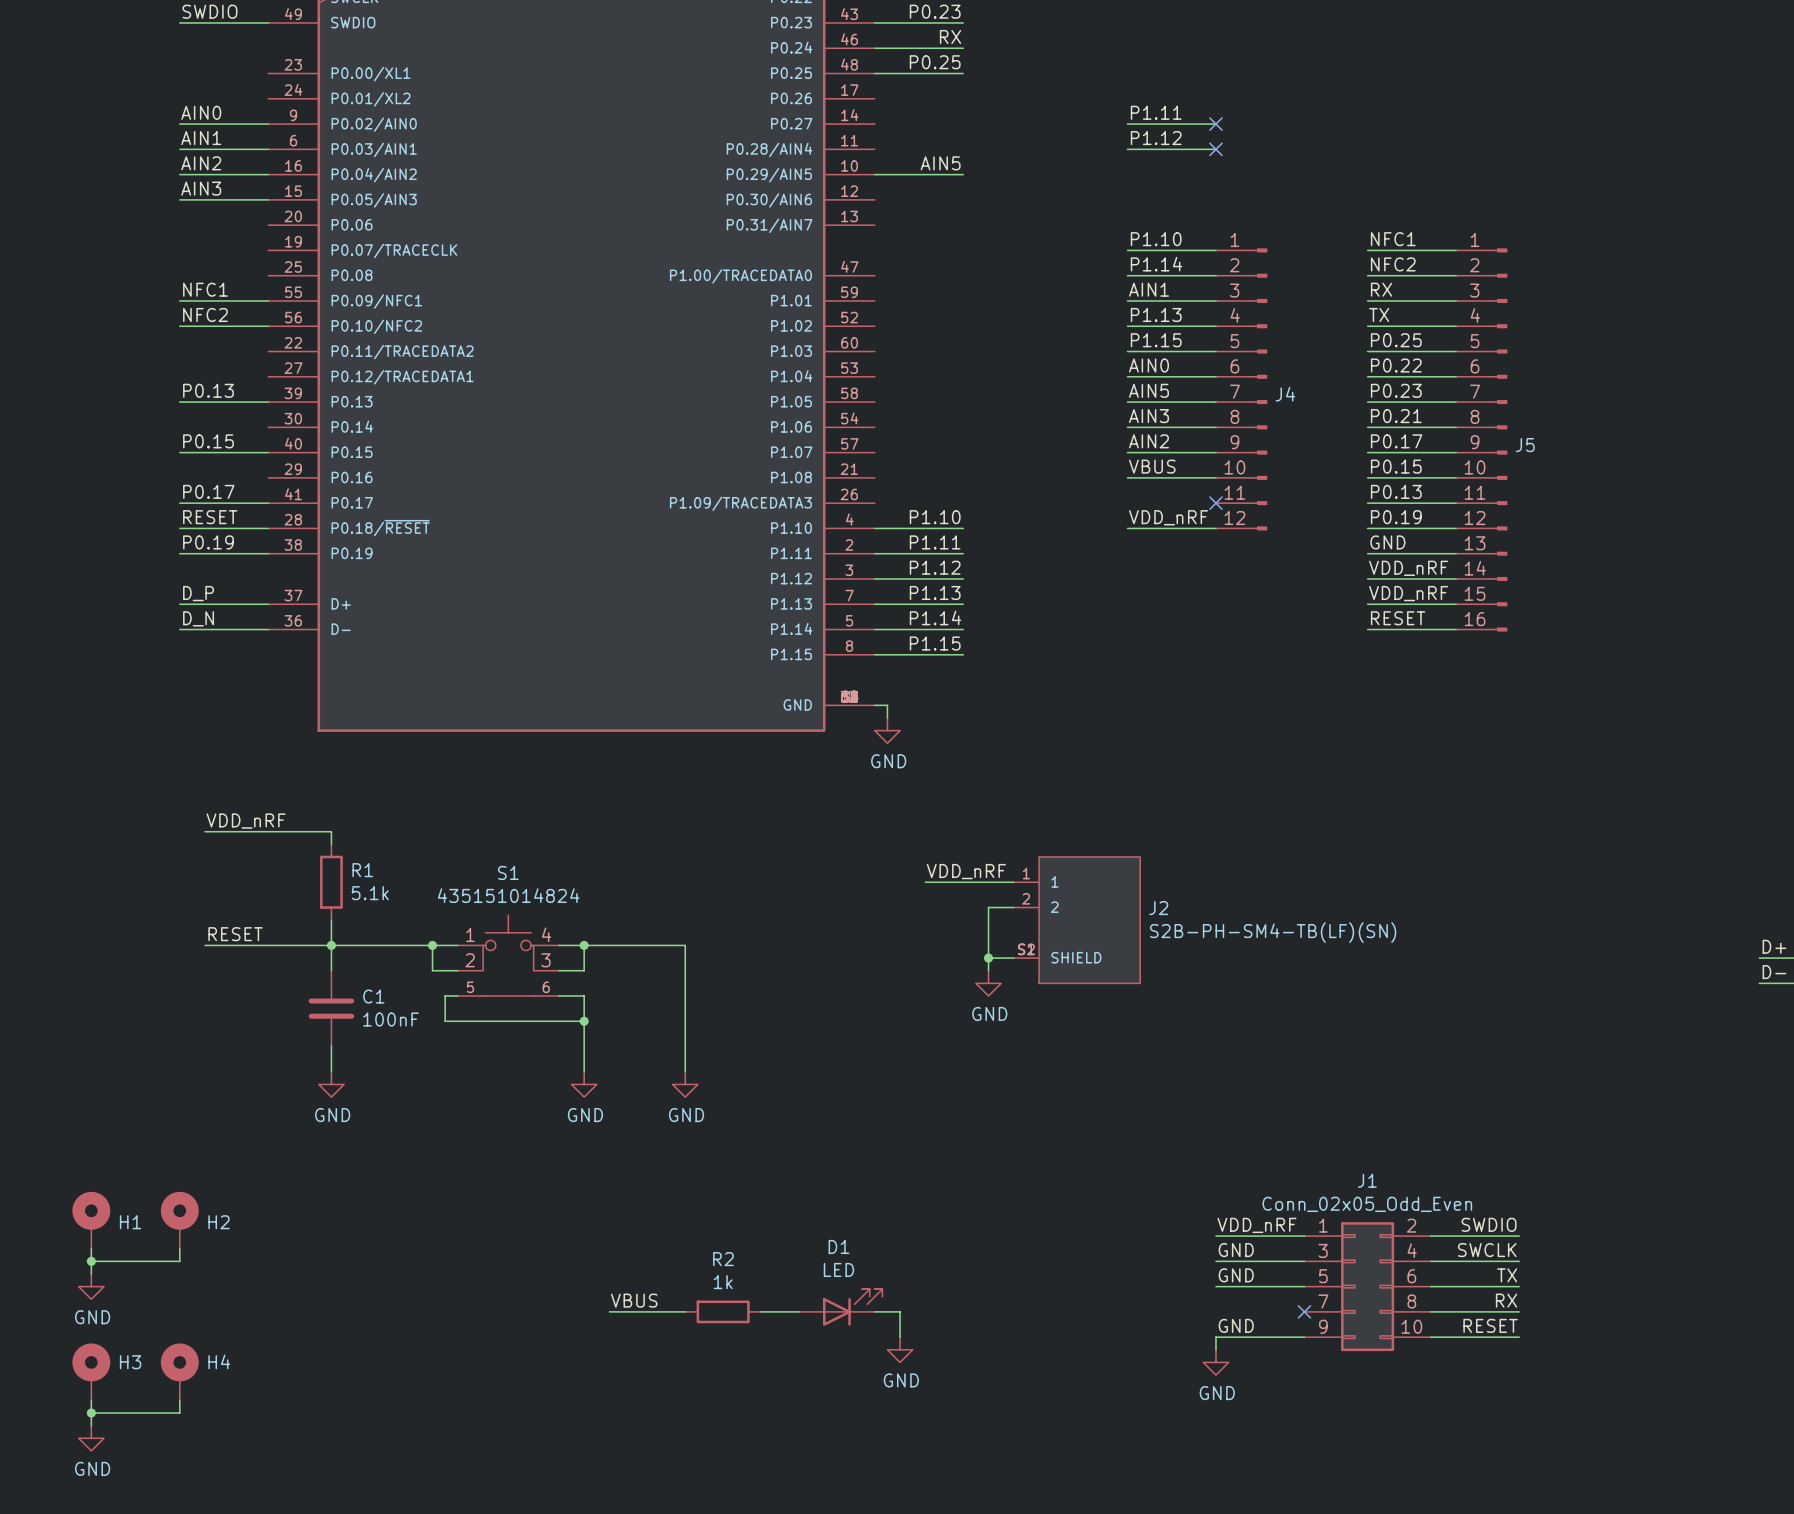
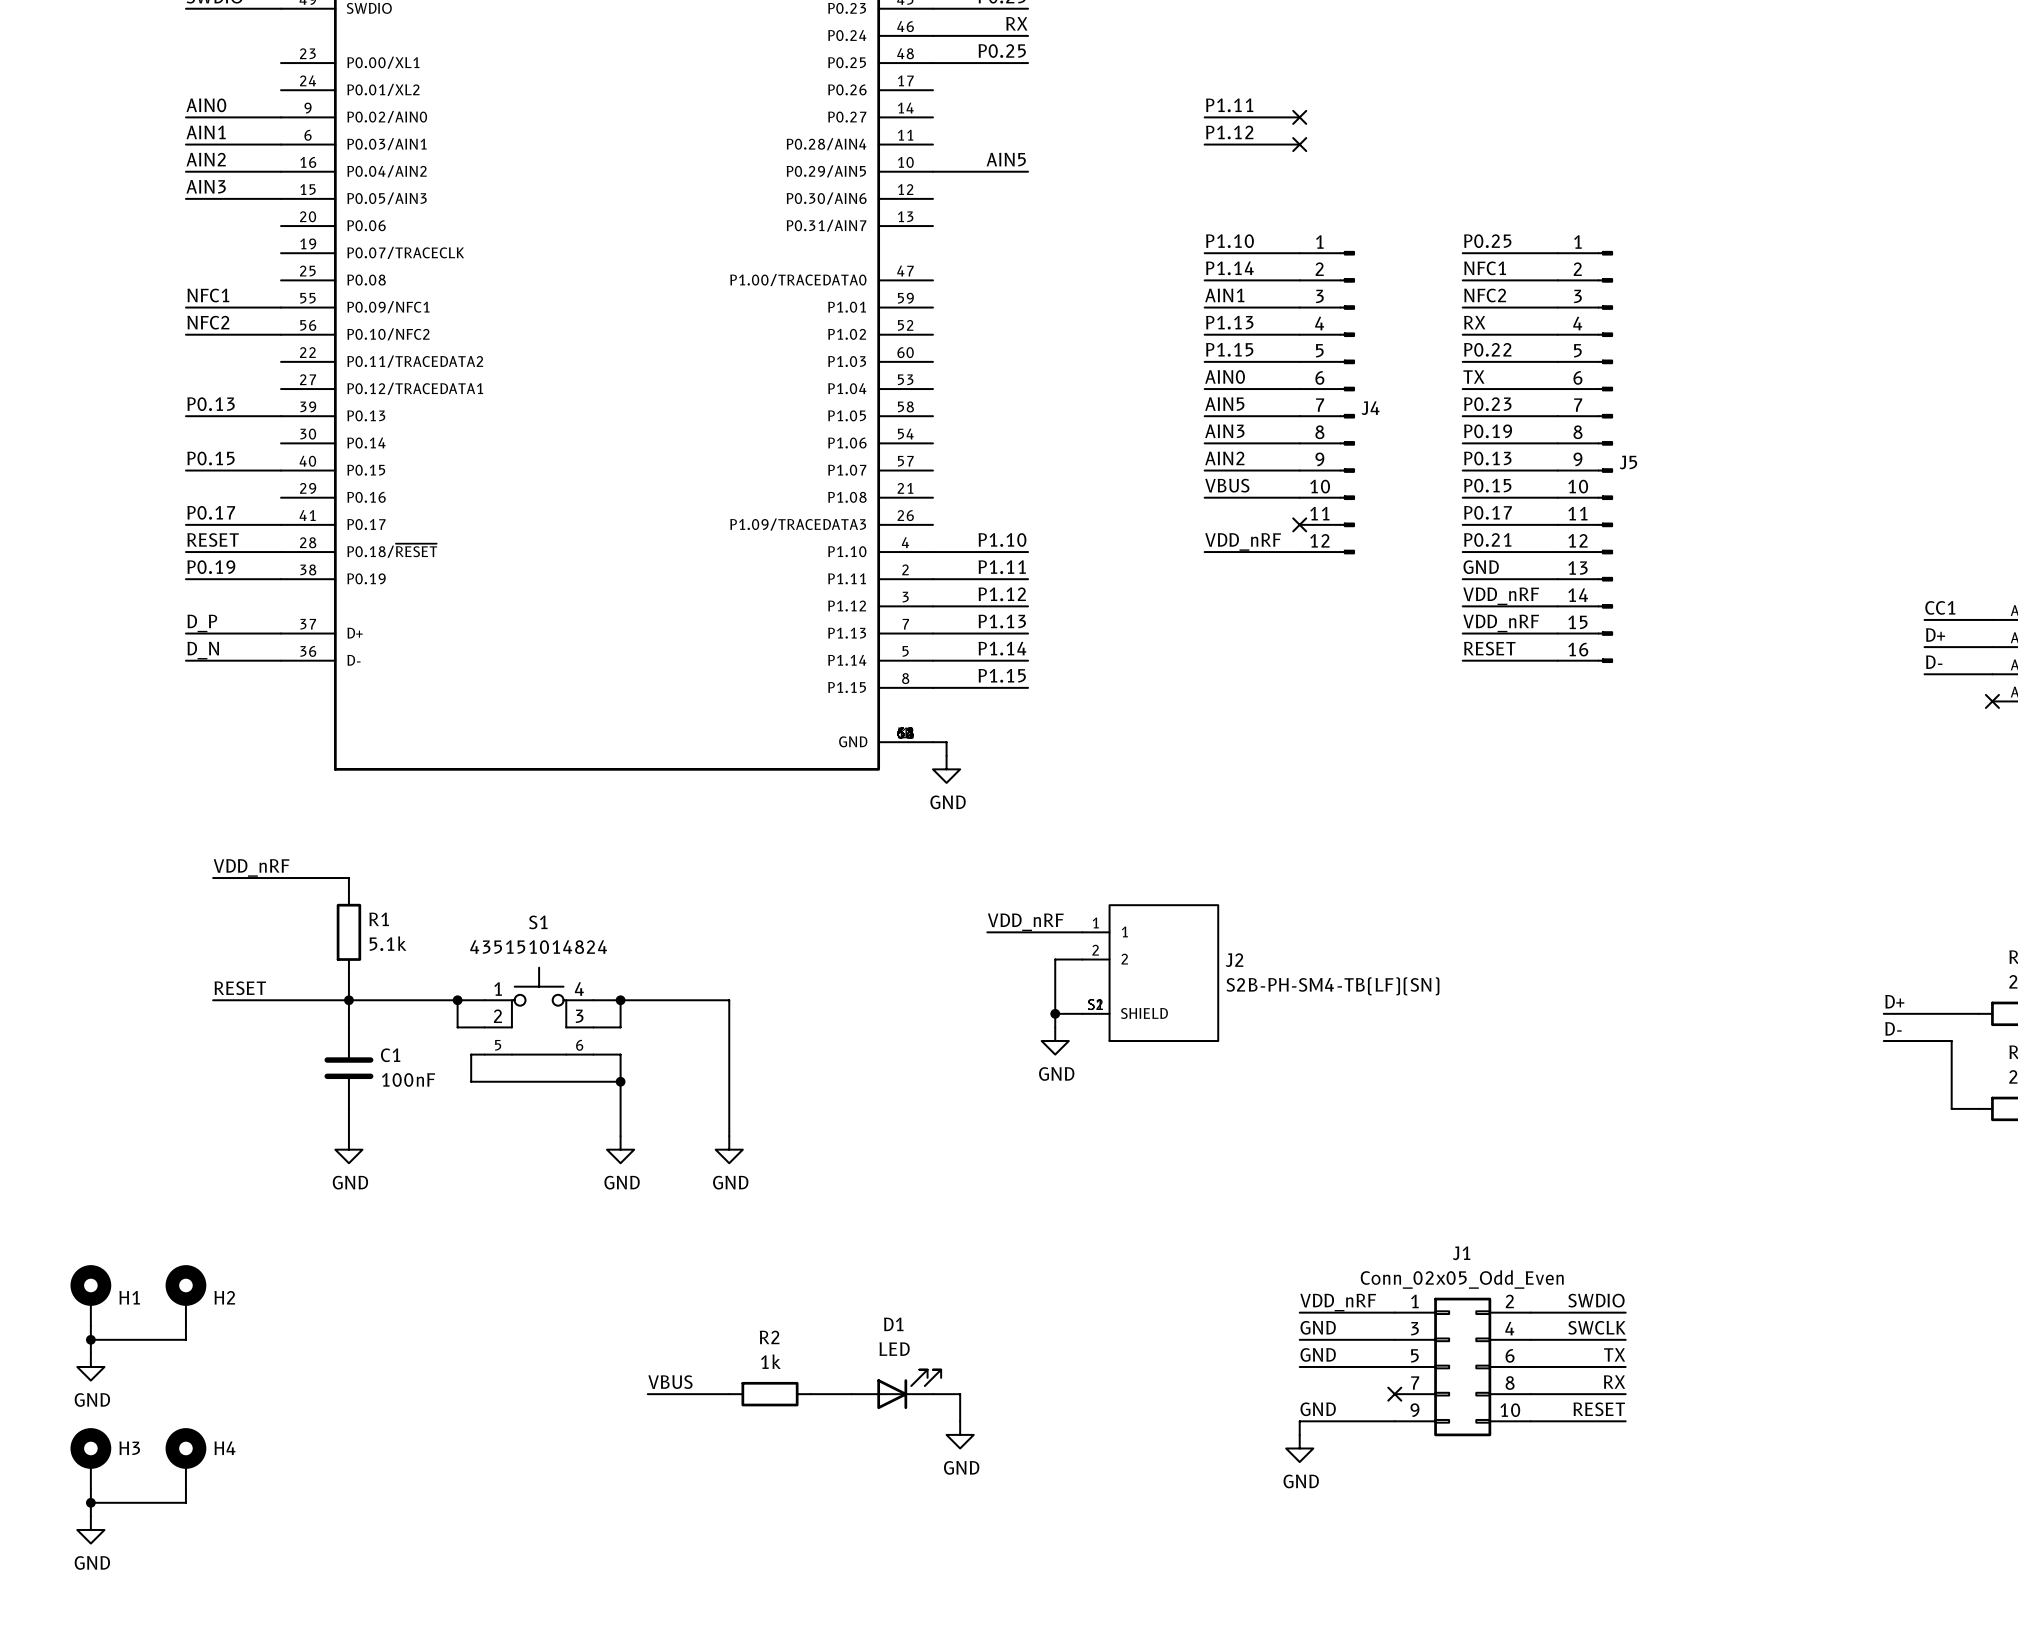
label: NFC1 (1393, 239) -> P0.25 (1487, 241)
label: NFC2 (1393, 264) -> NFC1 (1485, 268)
label: RX (1381, 289) -> NFC2 (1485, 295)
label: TX (1379, 314) -> RX (1474, 322)
label: P0.25 (1396, 340) -> P0.22 (1487, 349)
label: P0.22 (1396, 365) -> TX (1473, 376)
label: P0.21 (1396, 416) -> P0.19 (1488, 431)
label: P0.17 (1396, 441) -> P0.13 (1487, 458)
label: P0.13 (1396, 491) -> P0.17 (1487, 512)
label: P0.19 (1396, 517) -> P0.21 (1487, 539)

